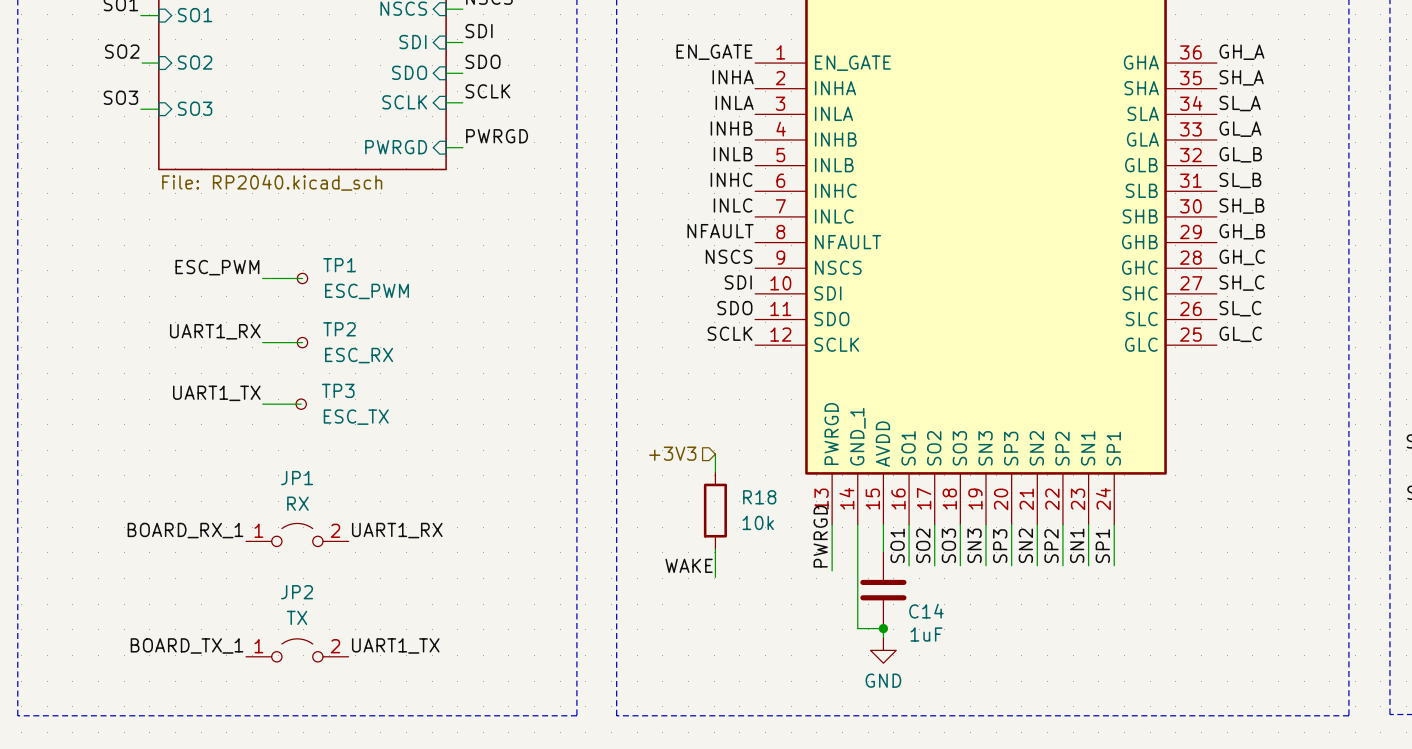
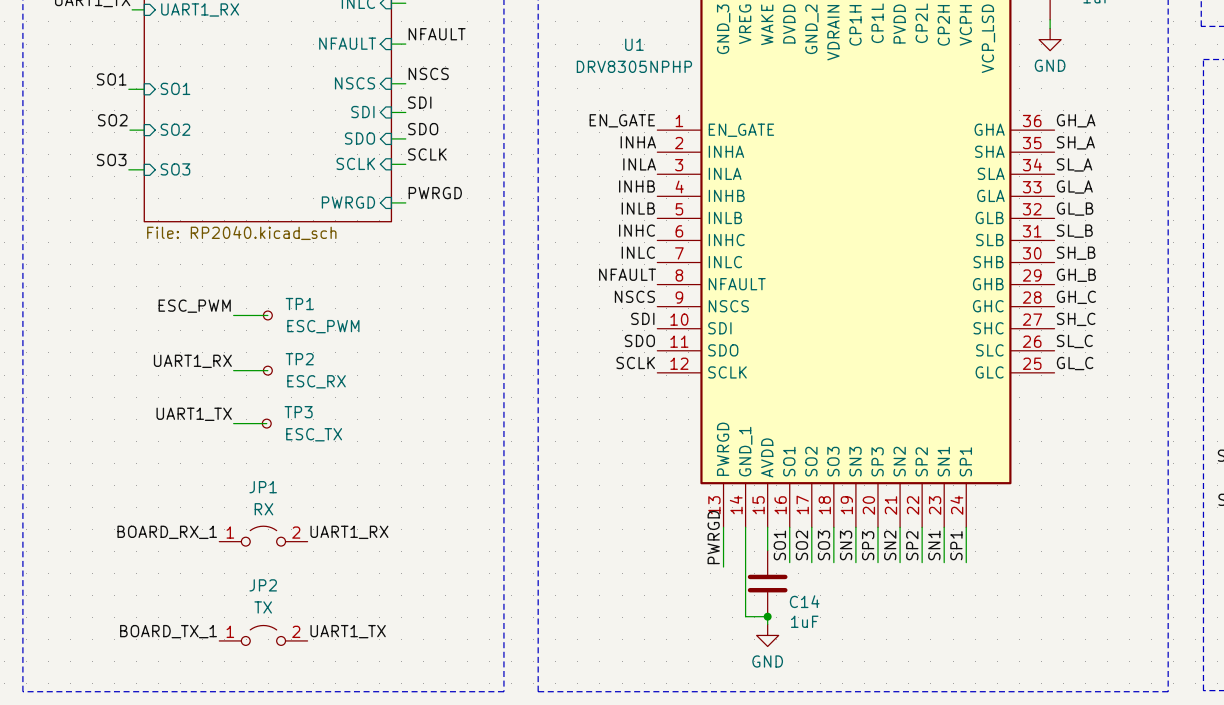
hierarchical label: +3V3 (672, 453) -> none
wire: (715, 454) (715, 472) -> none
R18: 10k (715, 510) -> none
wire: (715, 549) (715, 577) -> none
label: WAKE (689, 565) -> none

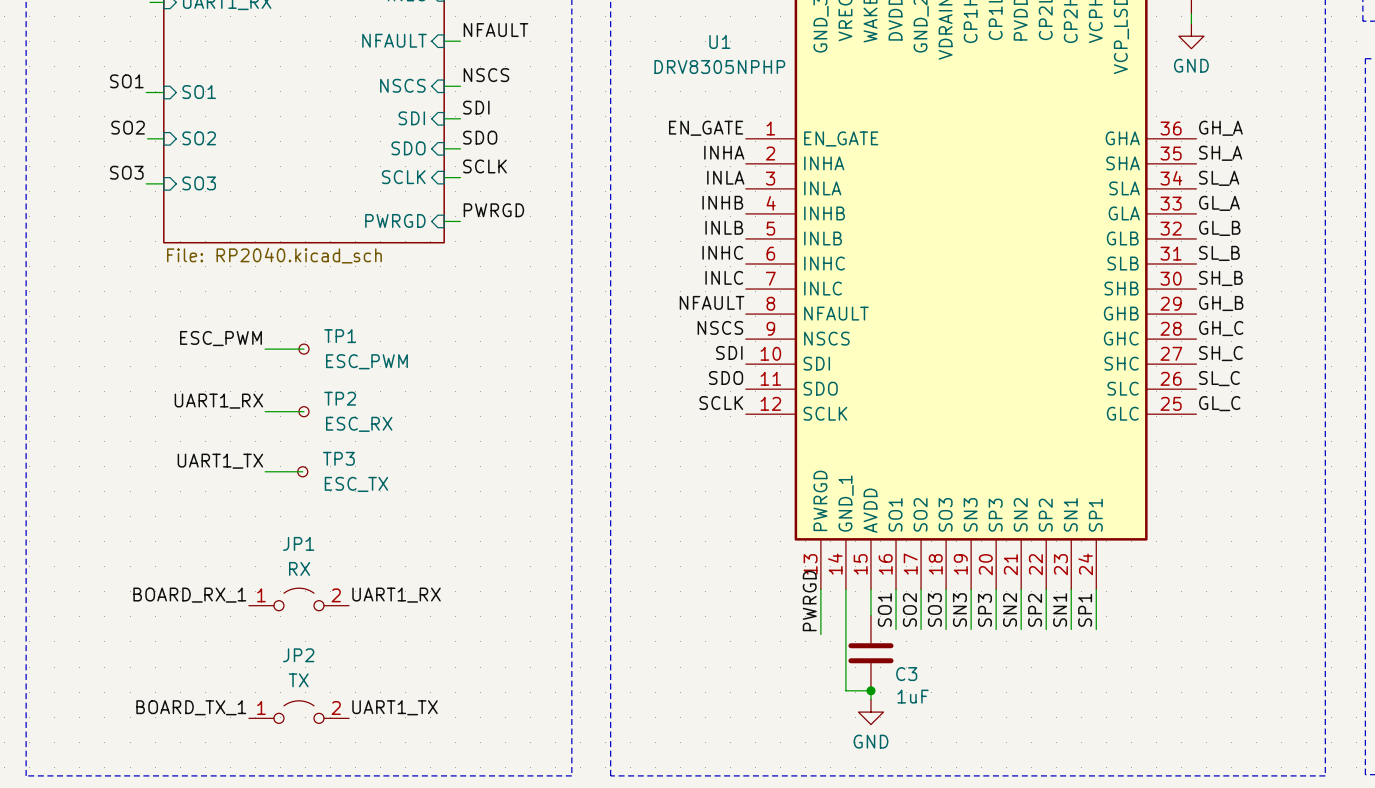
C14 name: C14 (804, 601) -> C3 (906, 674)

